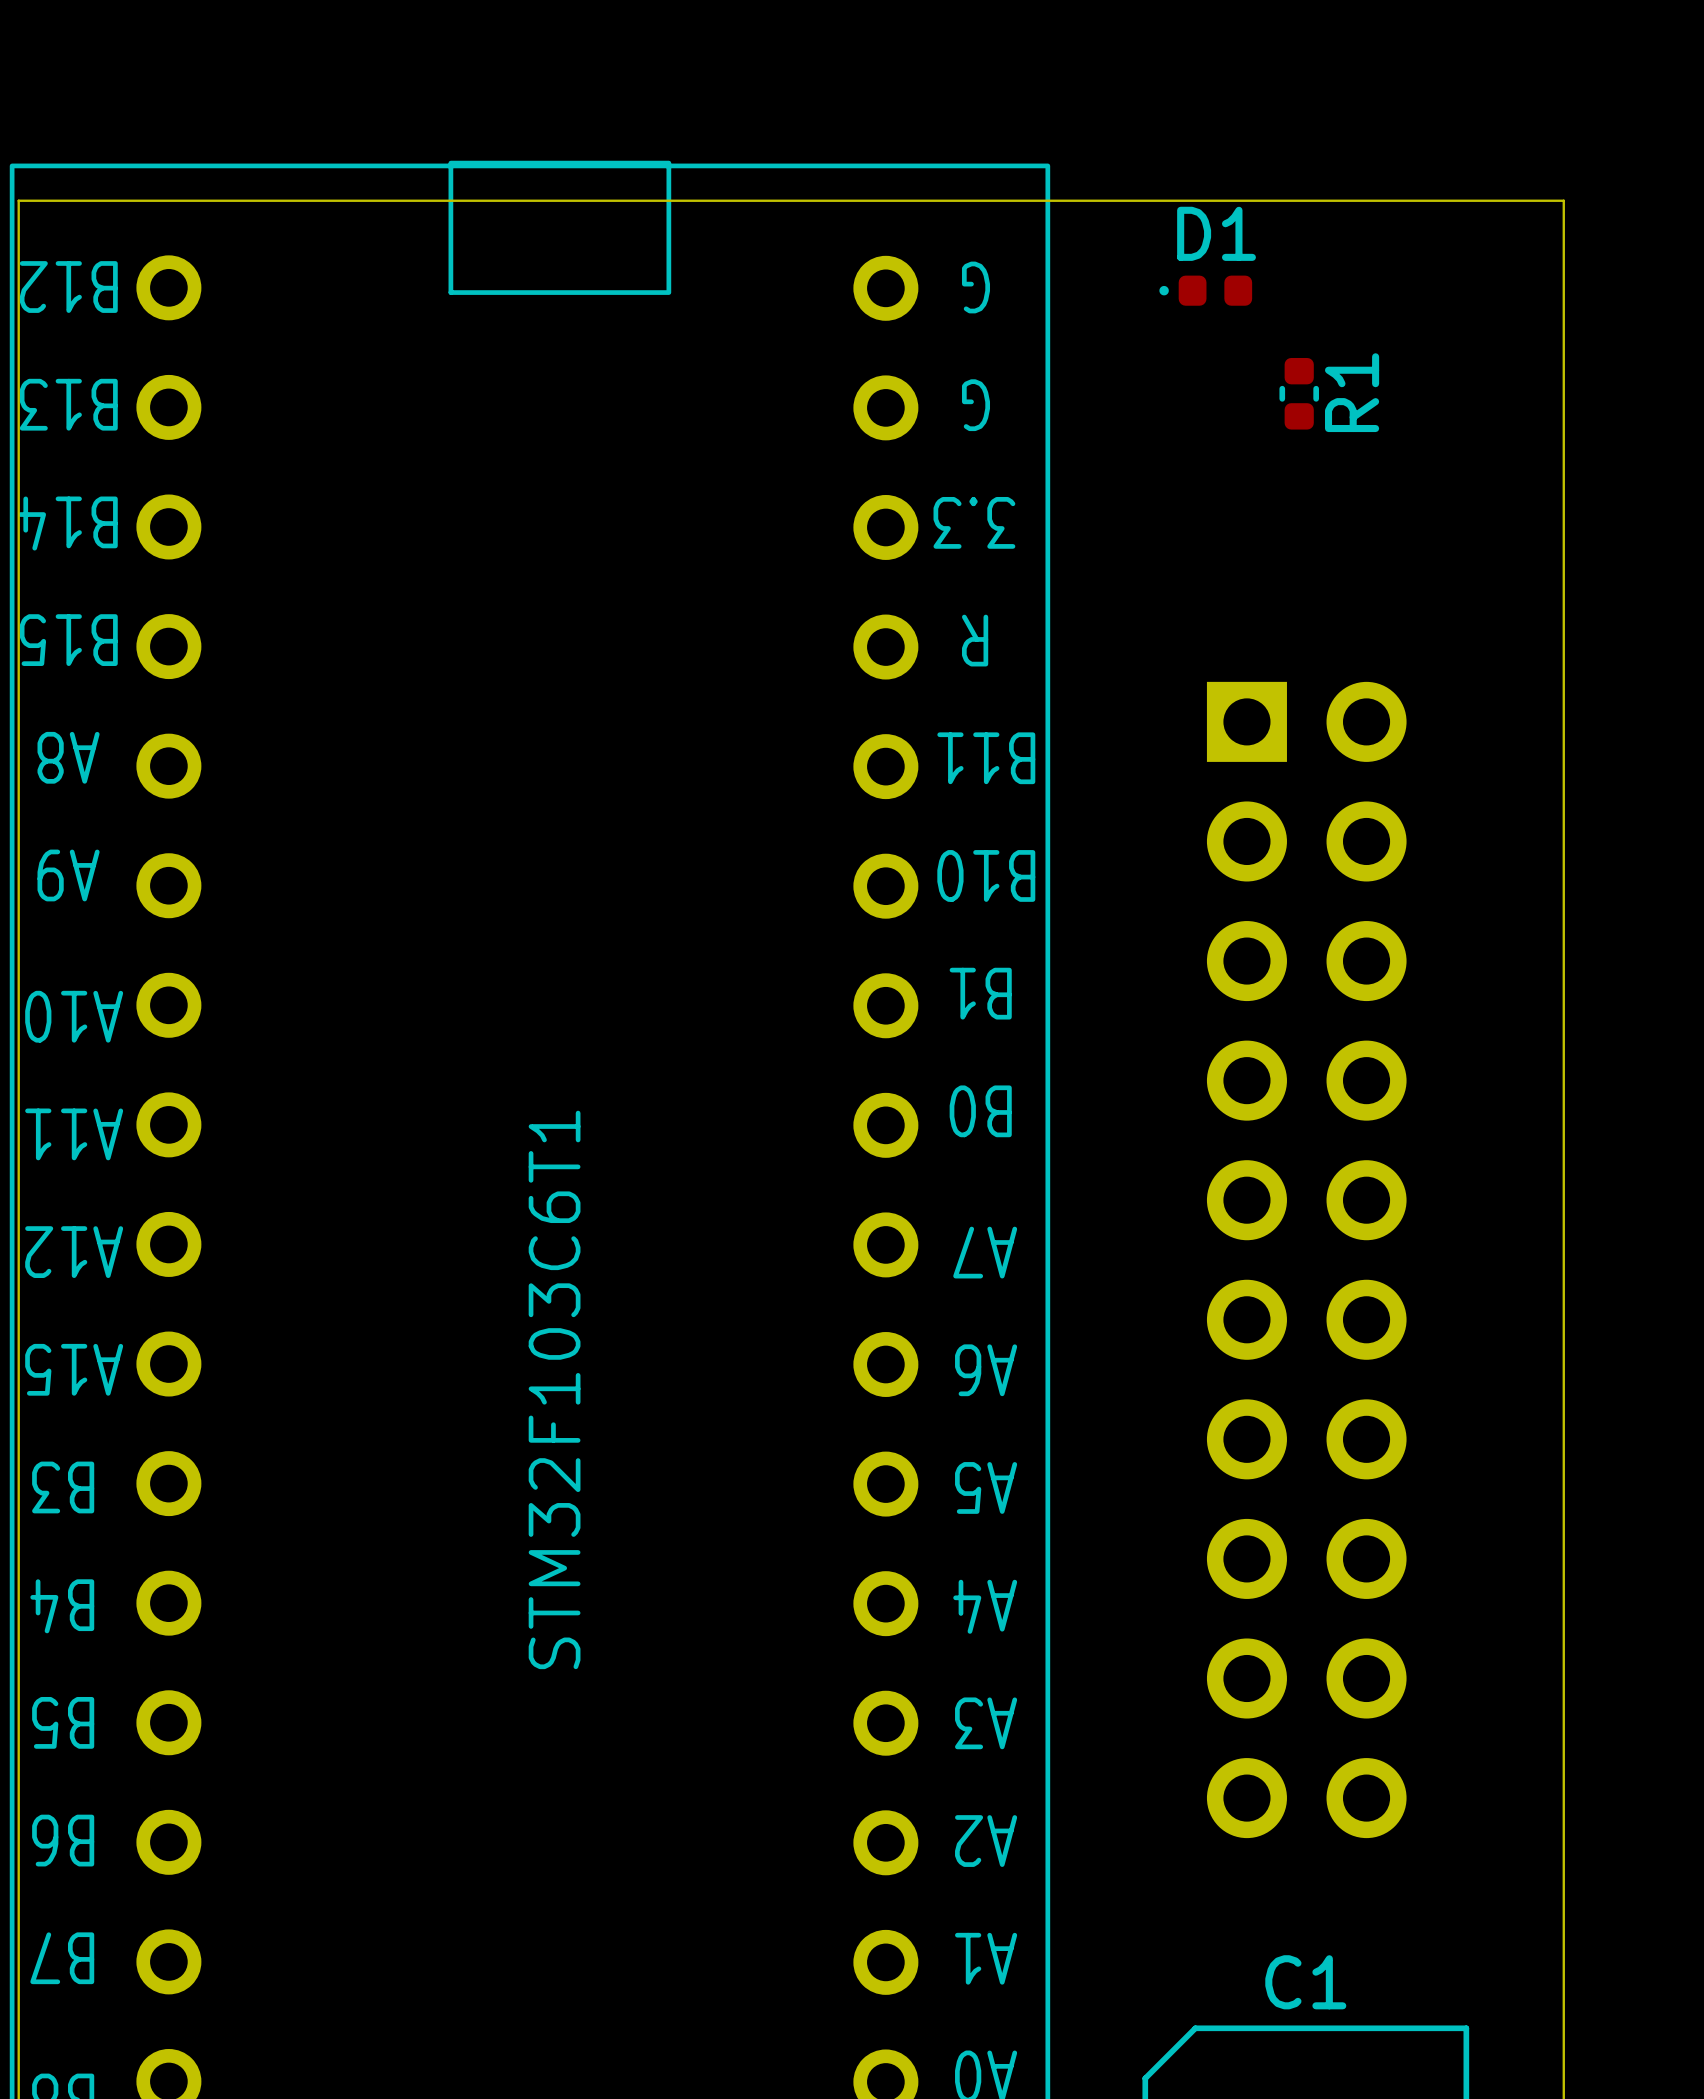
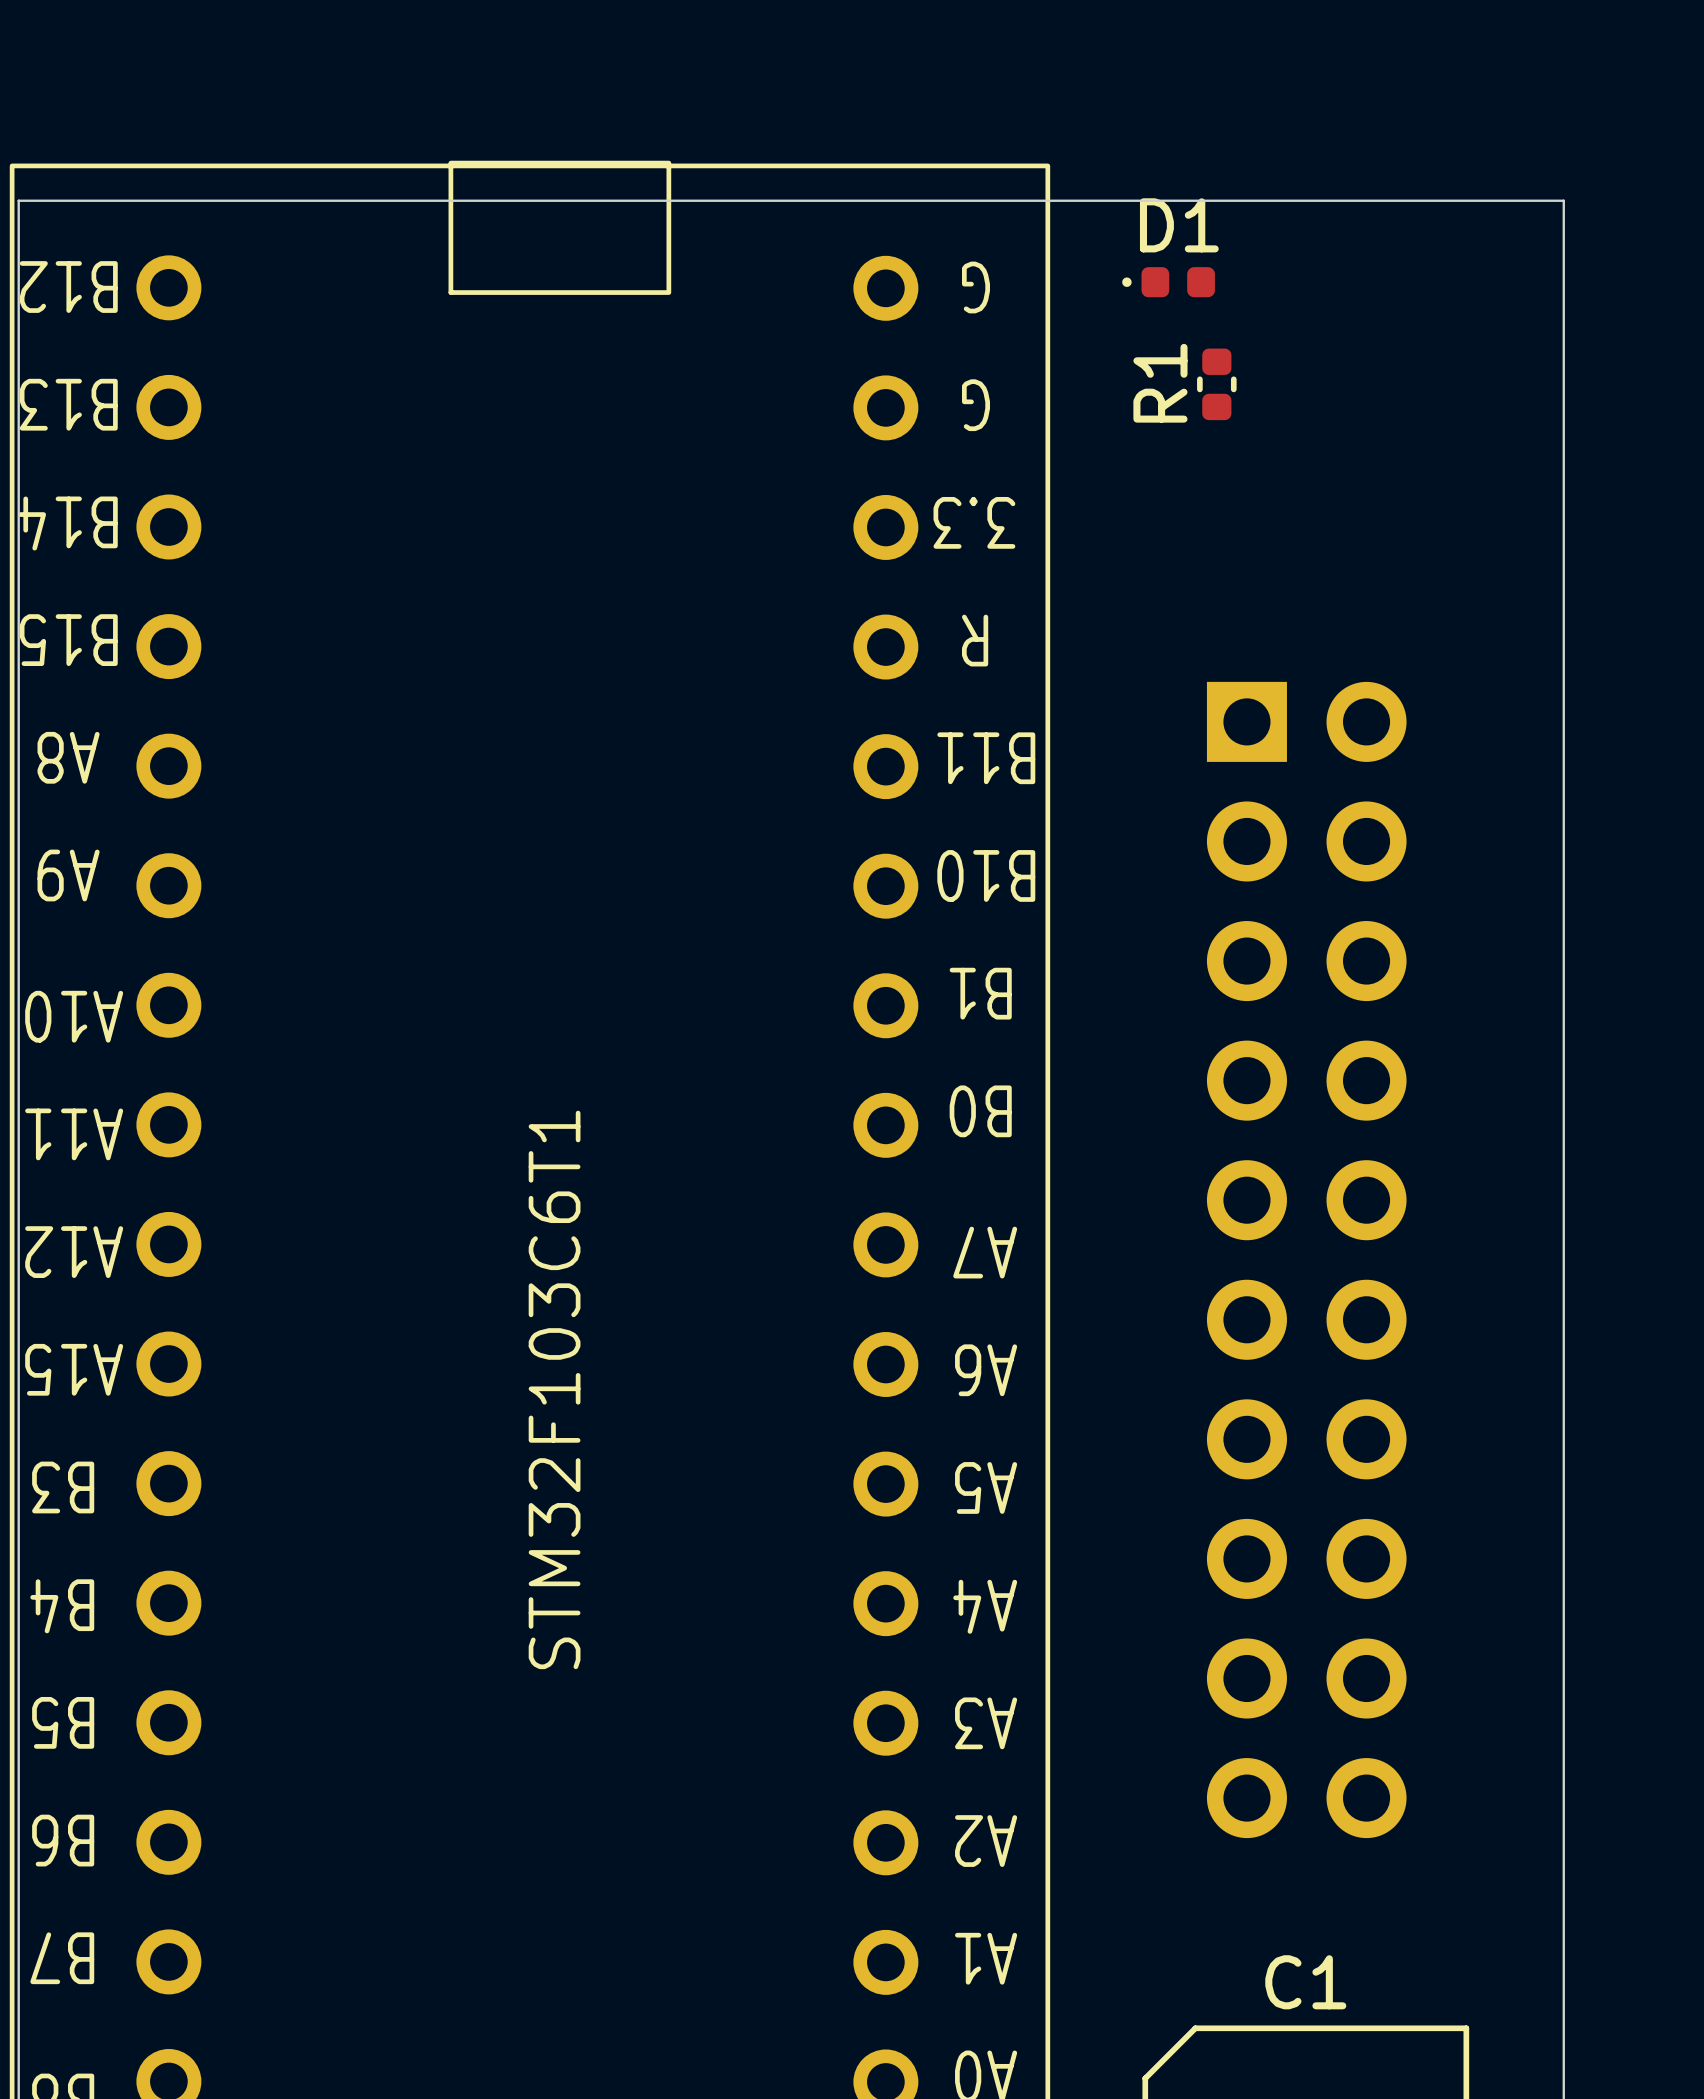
D1 position: (1205, 290) -> (1168, 282)
R1 name position: R1 (1352, 392) -> R1 (1160, 383)
R1 position: (1299, 393) -> (1216, 384)

